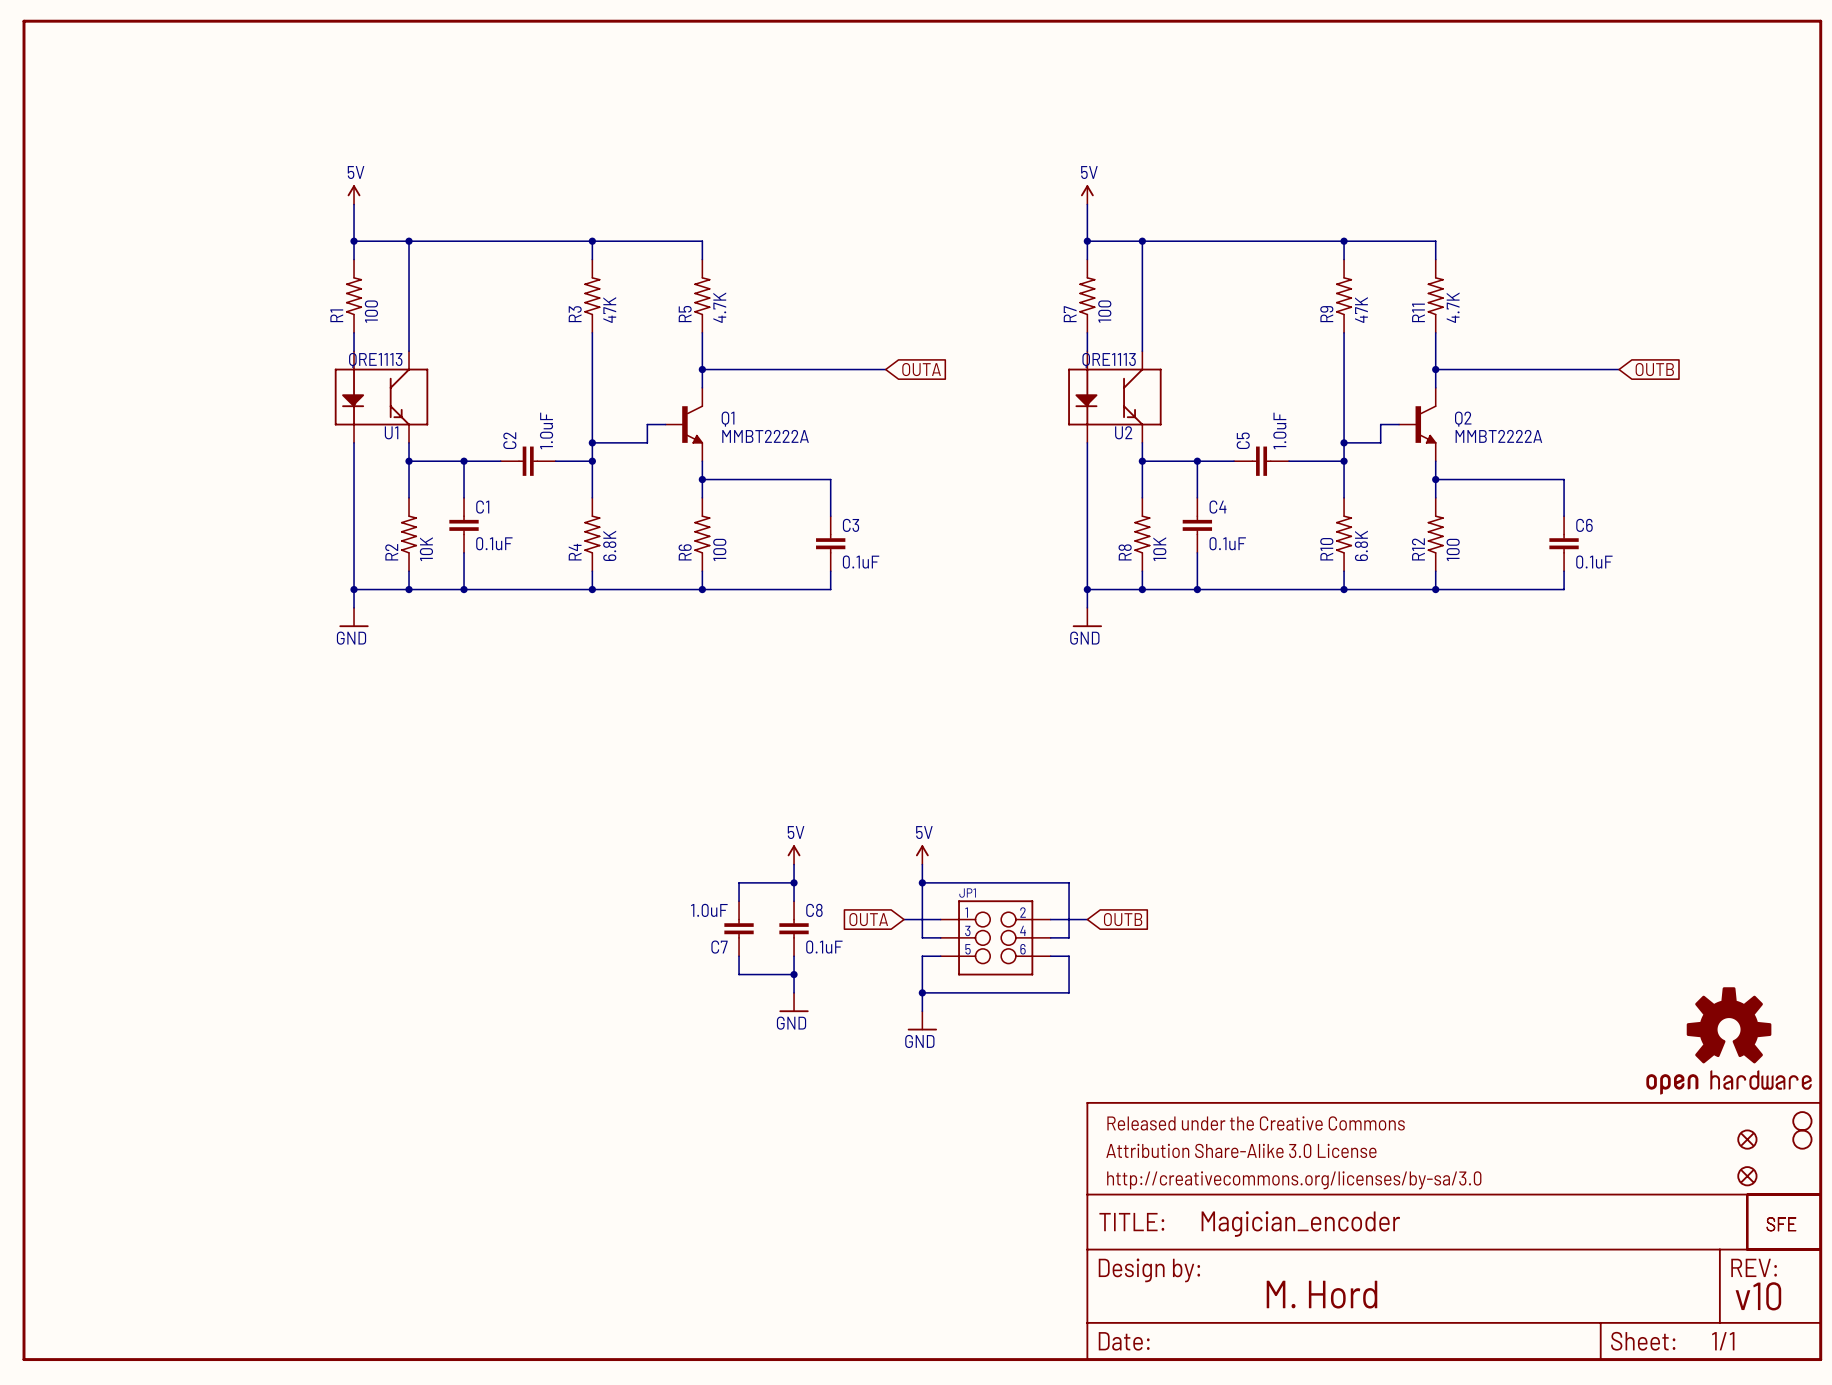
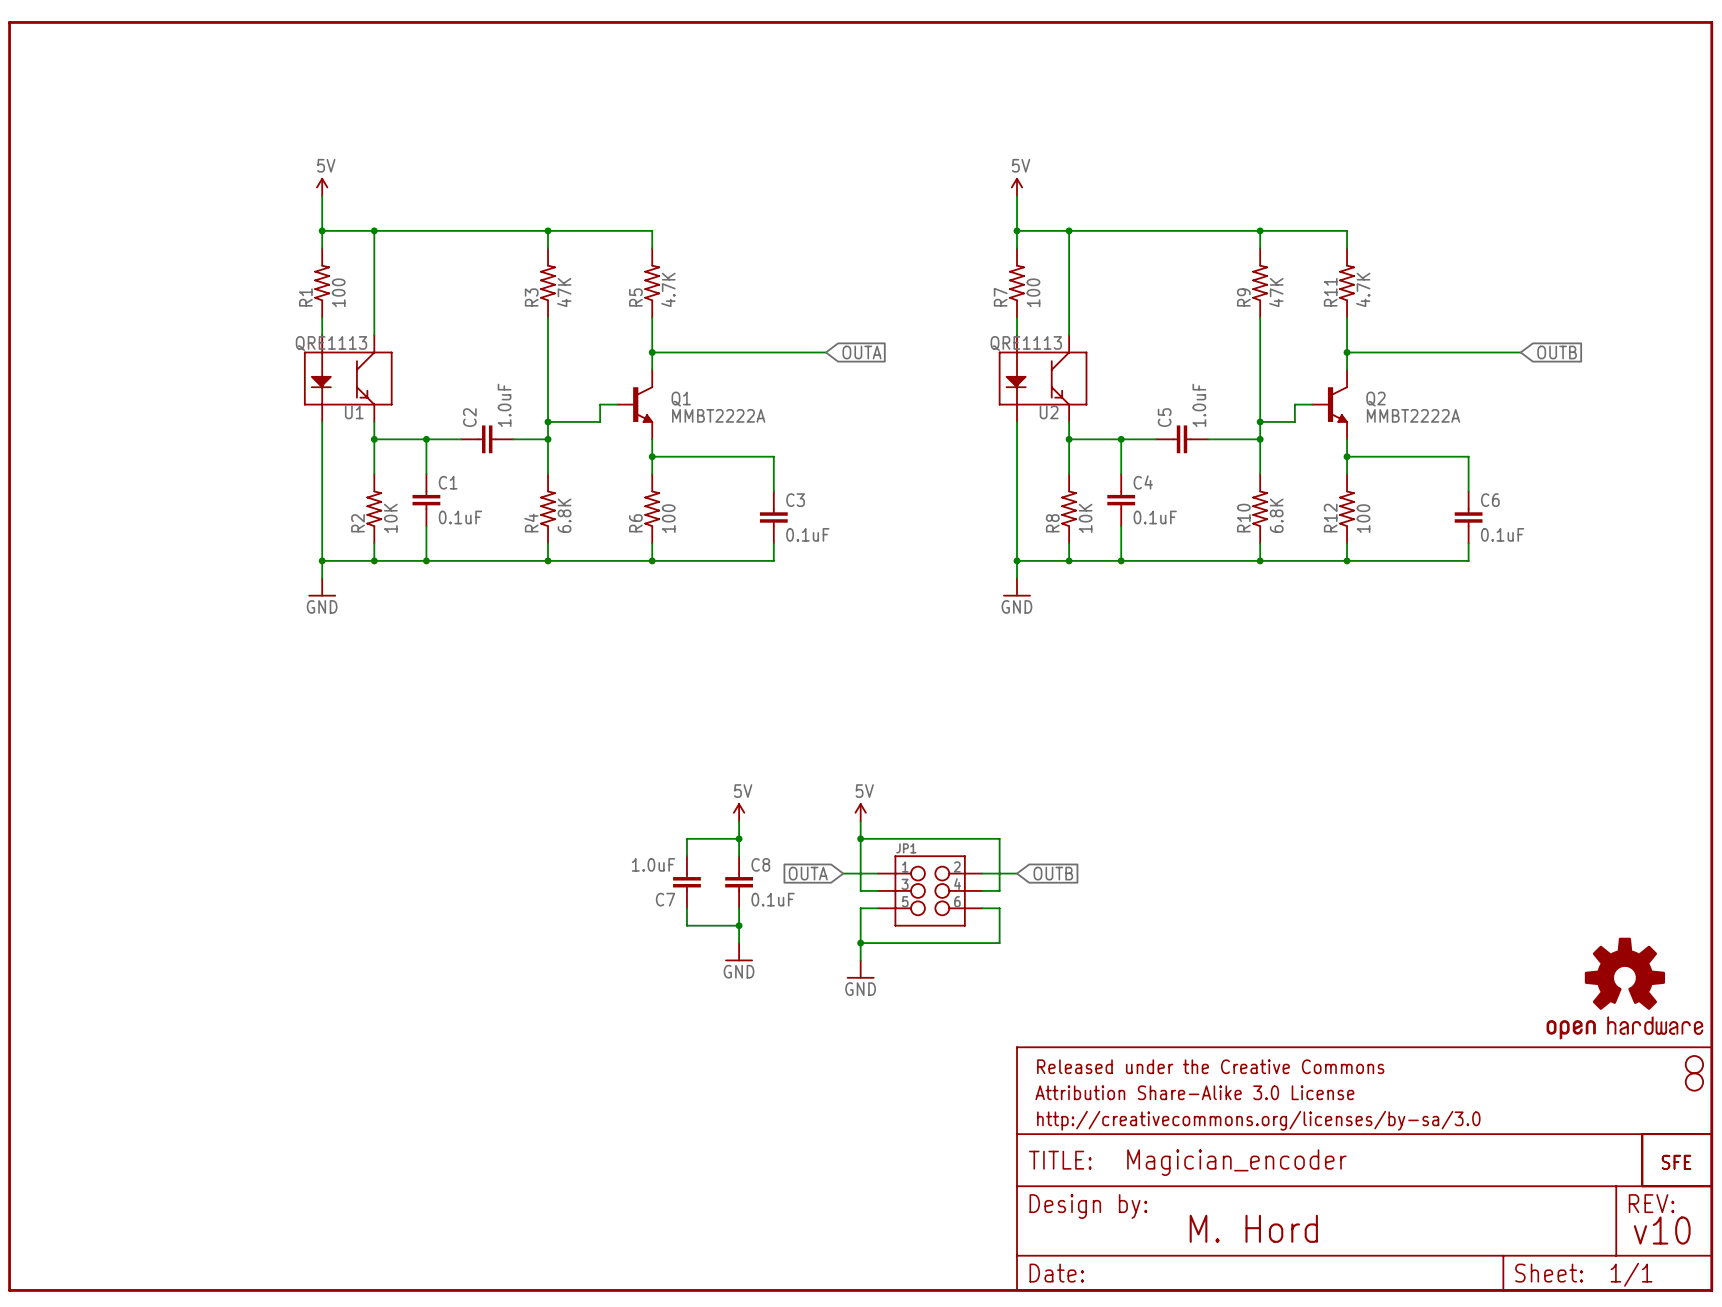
part: (1747, 1139) -> none
part: (1747, 1176) -> none

